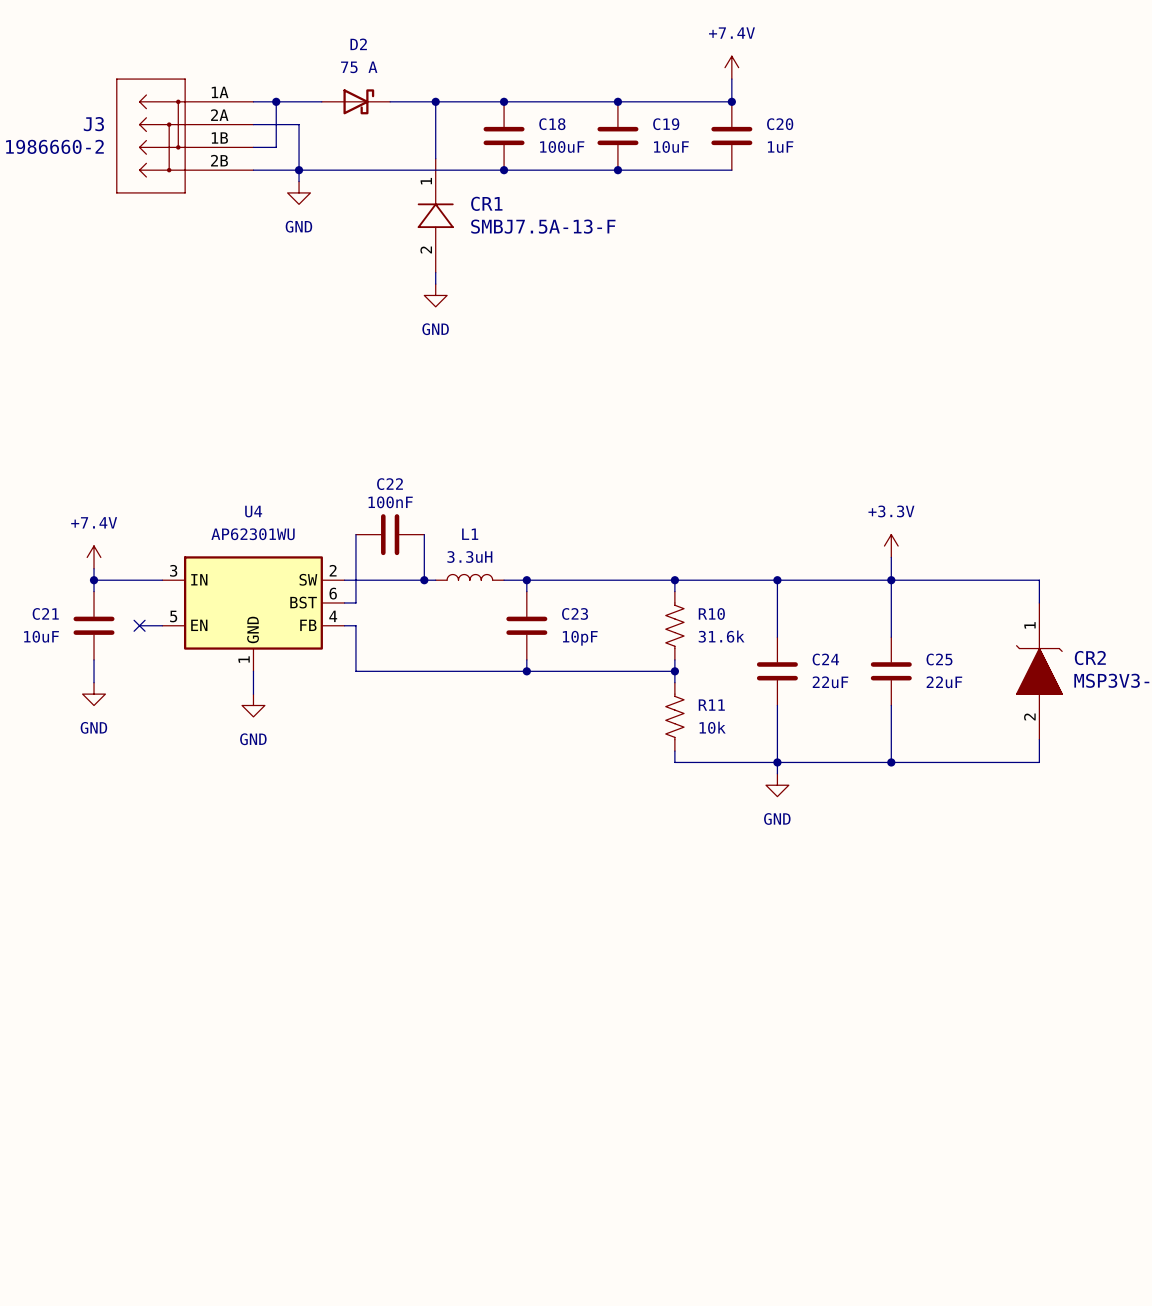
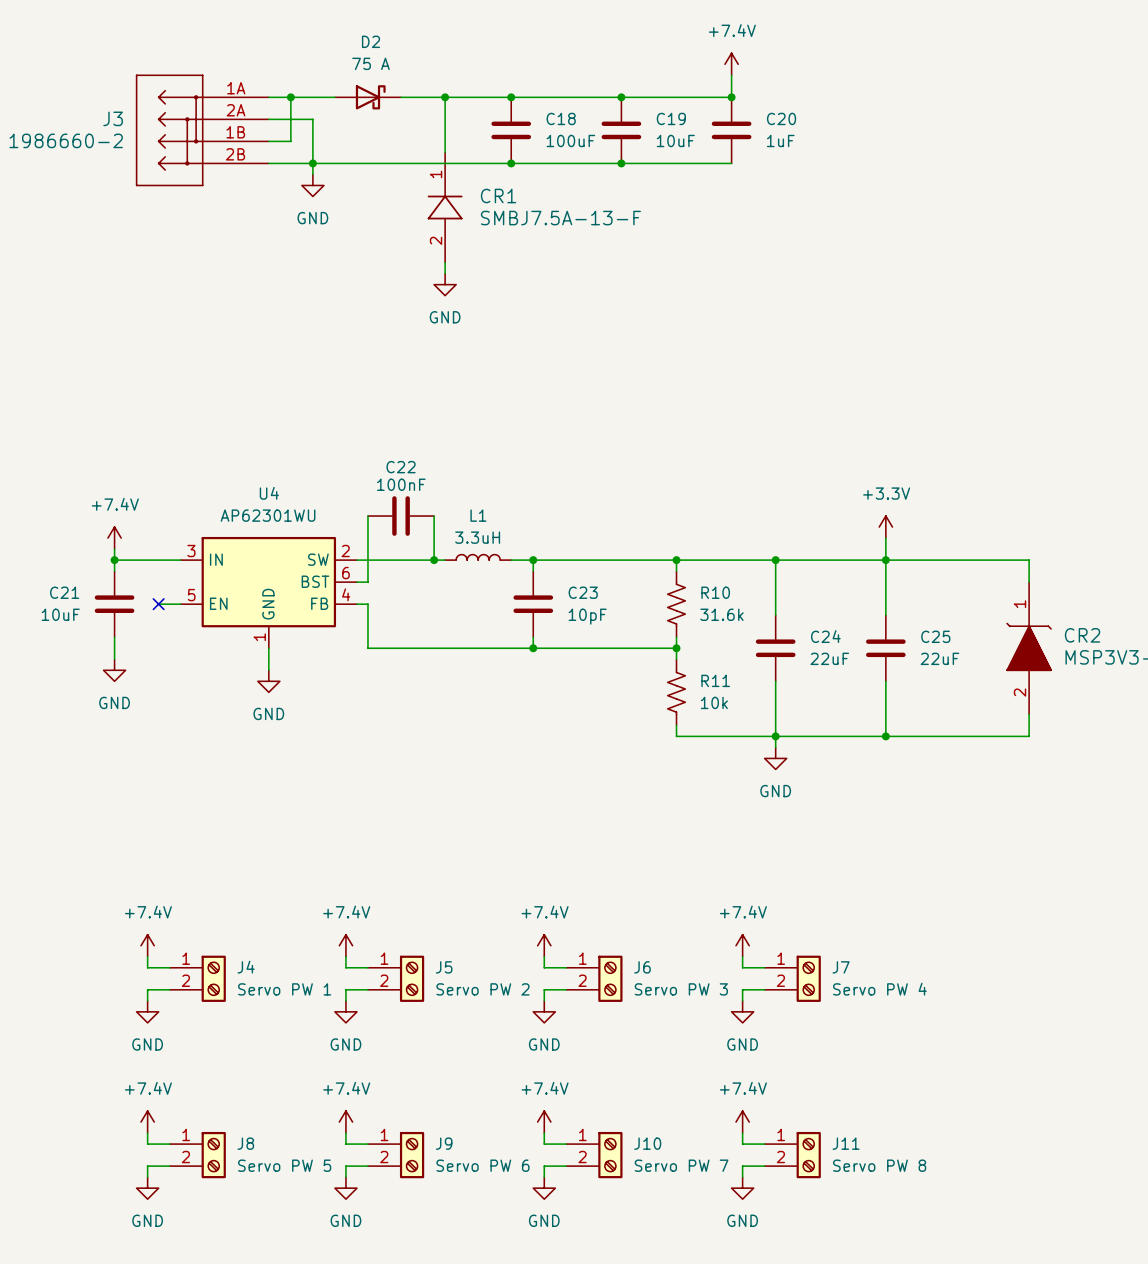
power symbol: none -> +7.4V (147, 945)
power symbol: none -> +7.4V (345, 945)
power symbol: none -> +7.4V (544, 945)
power symbol: none -> +7.4V (742, 945)
wire: none -> (147, 956) (147, 967) (169, 967)
wire: none -> (345, 956) (345, 967) (367, 967)
wire: none -> (544, 956) (544, 967) (566, 967)
wire: none -> (742, 956) (742, 967) (764, 967)
J4: none -> Servo PW 1 (197, 978)
J5: none -> Servo PW 2 (396, 978)
J6: none -> Servo PW 3 (594, 978)
J7: none -> Servo PW 4 (792, 978)
wire: none -> (169, 989) (147, 989) (147, 1000)
wire: none -> (367, 989) (345, 989) (345, 1000)
wire: none -> (566, 989) (544, 989) (544, 1000)
wire: none -> (764, 989) (742, 989) (742, 1000)
power symbol: none -> GND (147, 1011)
power symbol: none -> GND (345, 1011)
power symbol: none -> GND (544, 1011)
power symbol: none -> GND (742, 1011)
power symbol: none -> +7.4V (147, 1122)
power symbol: none -> +7.4V (345, 1122)
power symbol: none -> +7.4V (544, 1122)
power symbol: none -> +7.4V (742, 1122)
wire: none -> (147, 1133) (147, 1144) (169, 1144)
wire: none -> (345, 1133) (345, 1144) (367, 1144)
wire: none -> (544, 1133) (544, 1144) (566, 1144)
wire: none -> (742, 1133) (742, 1144) (764, 1144)
J8: none -> Servo PW 5 (197, 1155)
J9: none -> Servo PW 6 (396, 1155)
J10: none -> Servo PW 7 (594, 1155)
J11: none -> Servo PW 8 (792, 1155)
wire: none -> (169, 1166) (147, 1166) (147, 1177)
wire: none -> (367, 1166) (345, 1166) (345, 1177)
wire: none -> (566, 1166) (544, 1166) (544, 1177)
wire: none -> (764, 1166) (742, 1166) (742, 1177)
power symbol: none -> GND (147, 1188)
power symbol: none -> GND (345, 1188)
power symbol: none -> GND (544, 1188)
power symbol: none -> GND (742, 1188)

